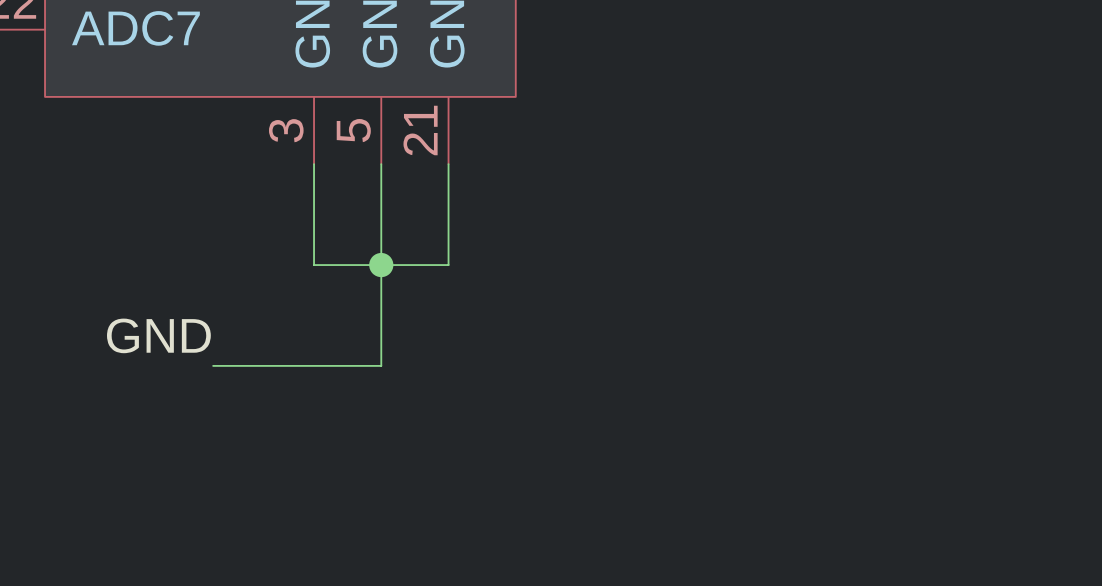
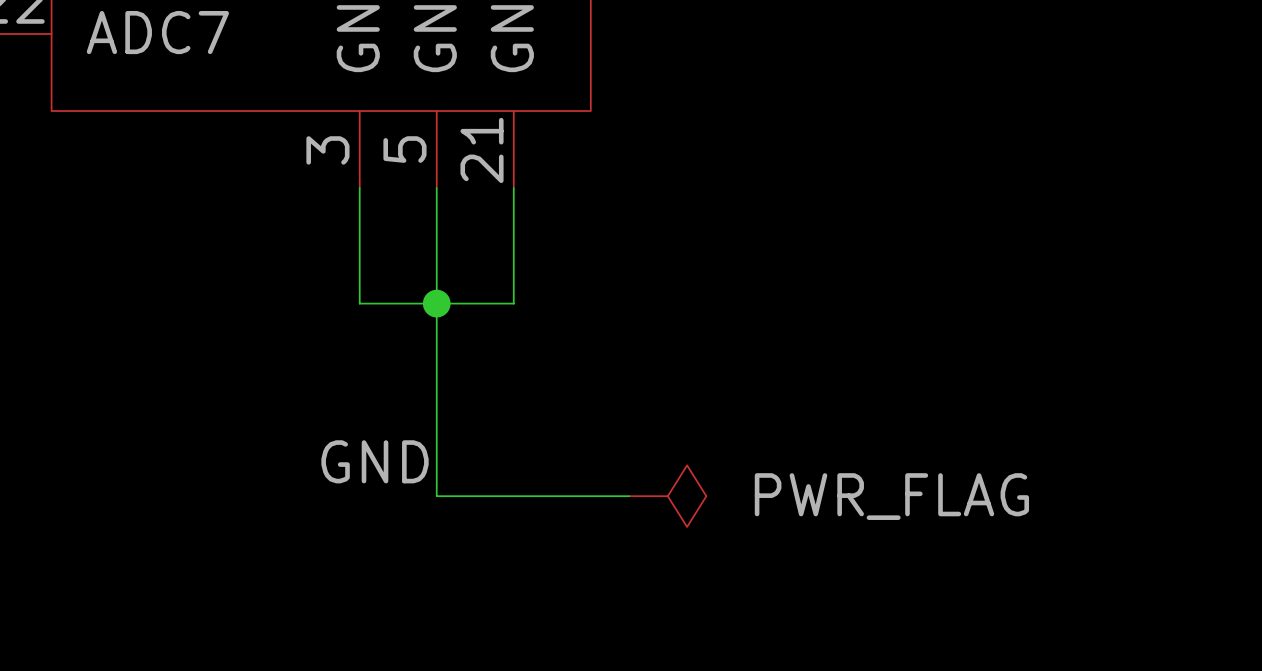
label position: GND (158, 335) -> GND (375, 461)
wire: (213, 365) (381, 365) -> (629, 496) (436, 496) (436, 419)
power symbol: none -> PWR_FLAG (667, 496)

